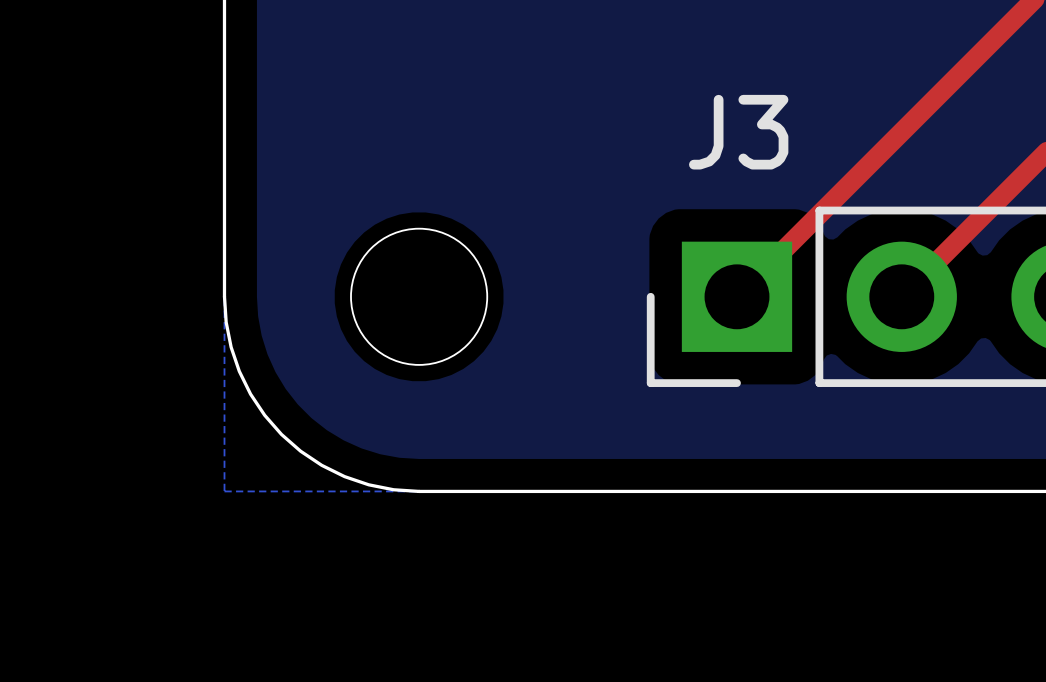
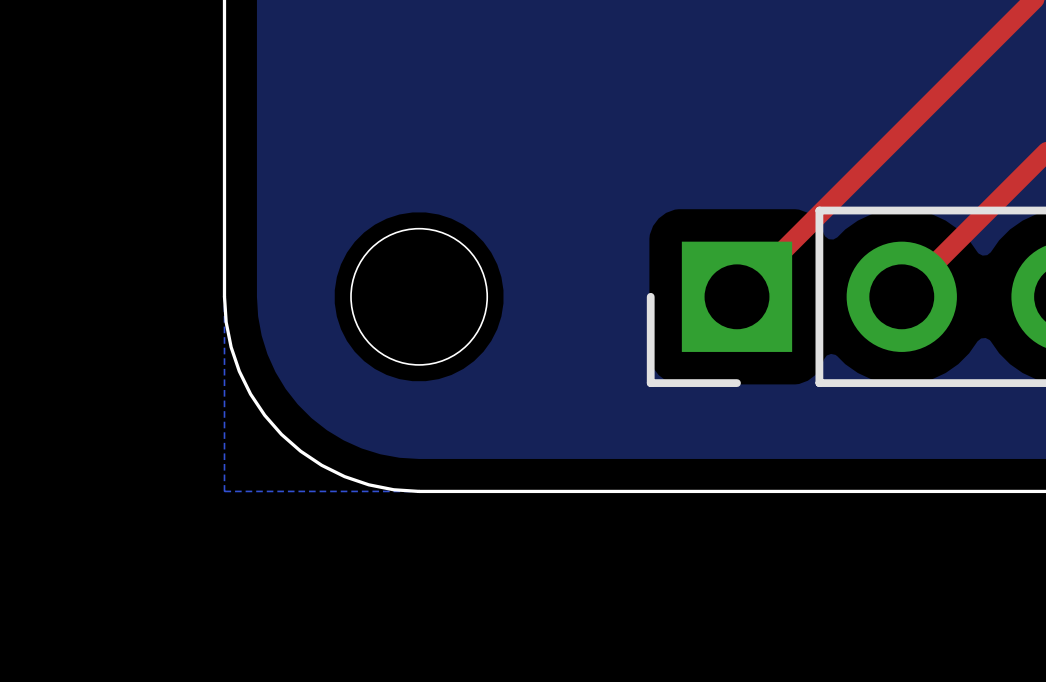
J3 name: J3 (738, 132) -> none

